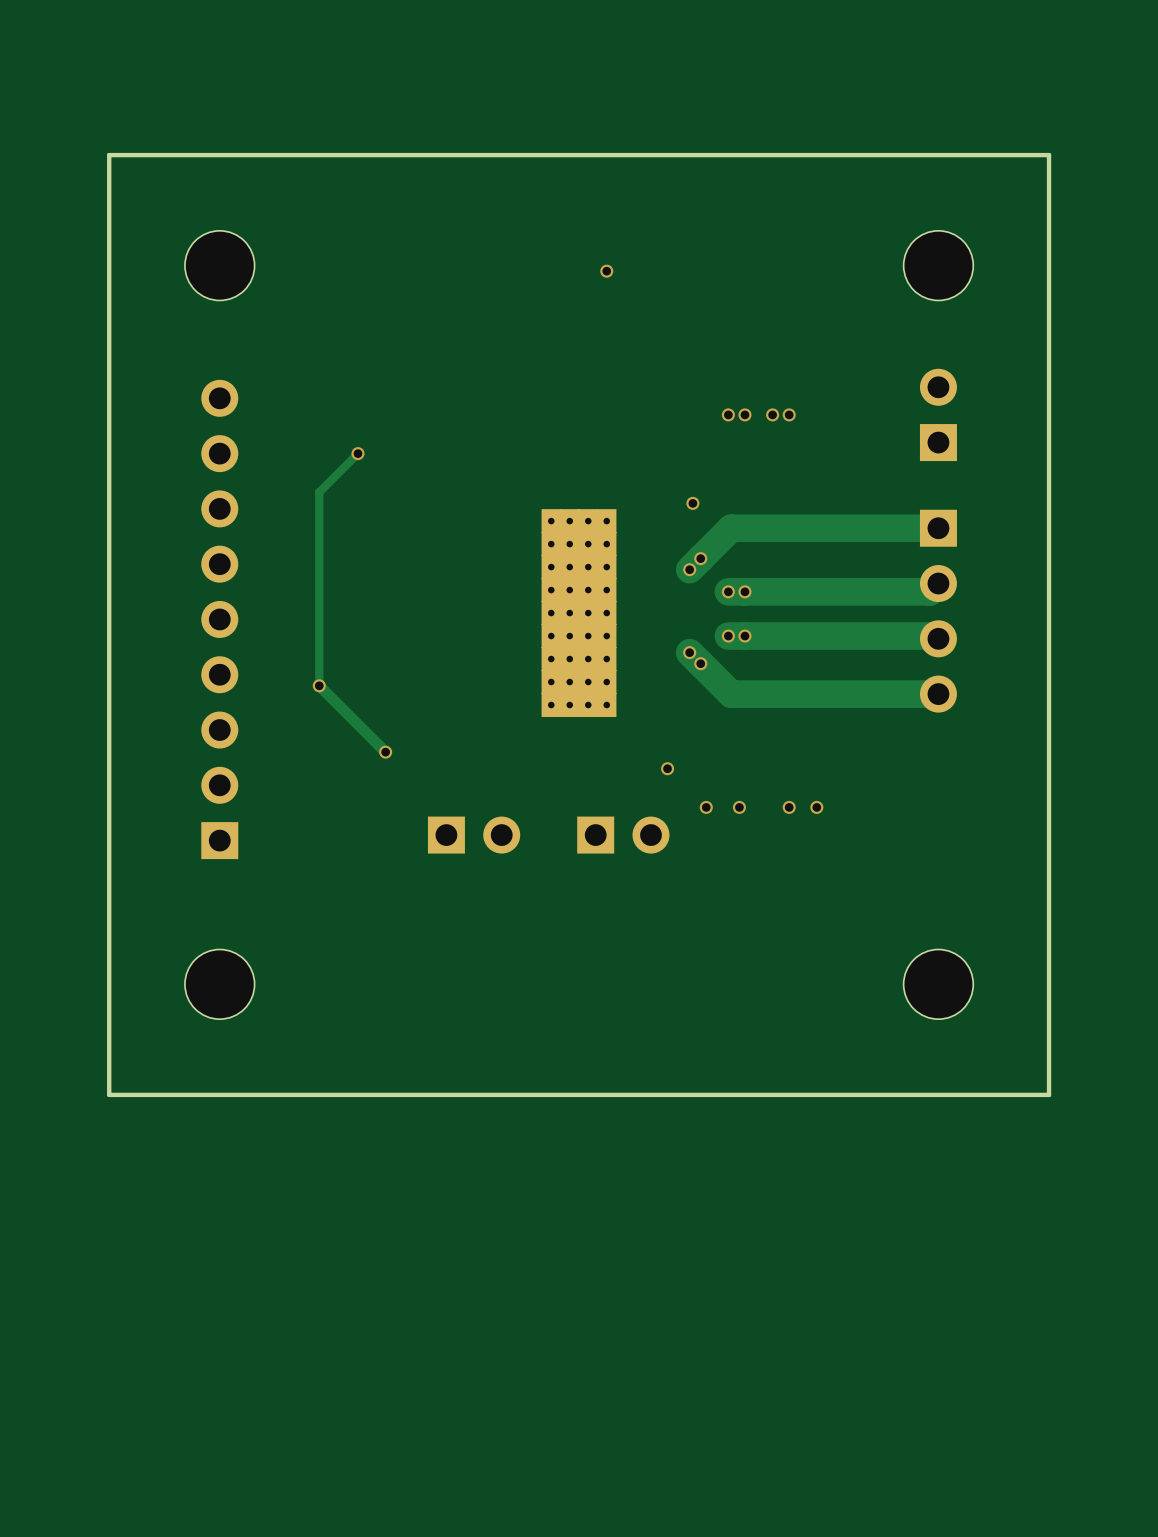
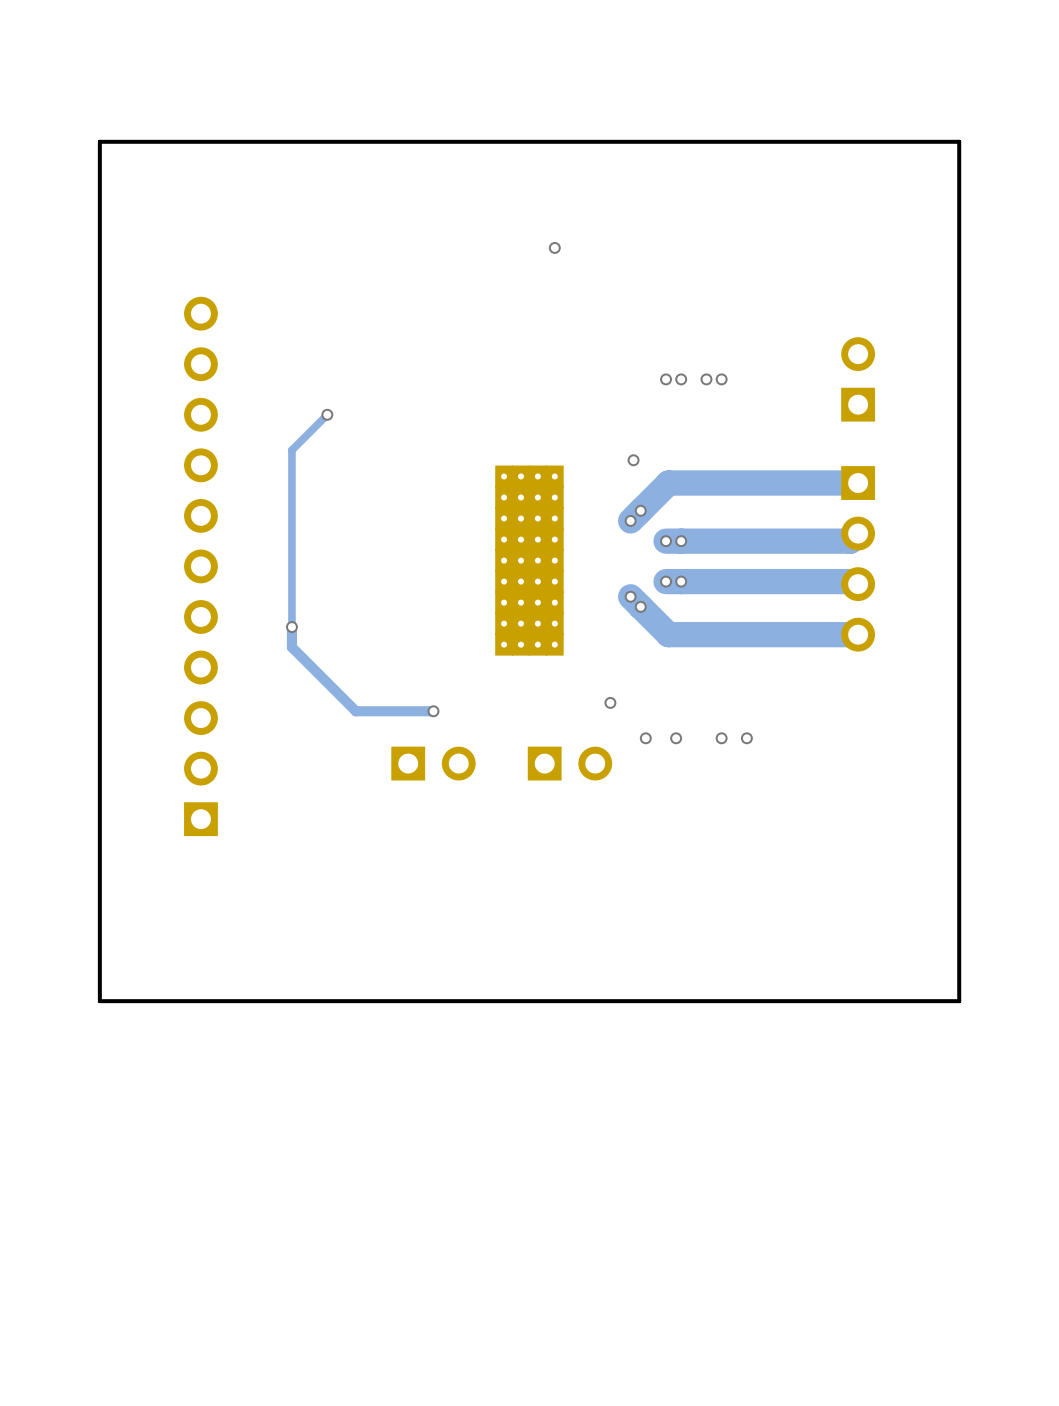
part: (219, 265) -> none
part: (938, 265) -> none
part footprint: [201, 379, 239, 860] -> [184, 296, 218, 837]
track: (319, 685) (385, 752) -> (291, 627) (291, 647) (355, 711) (433, 711)
via position: (385, 752) -> (433, 711)
part: (219, 984) -> none
part: (938, 984) -> none

